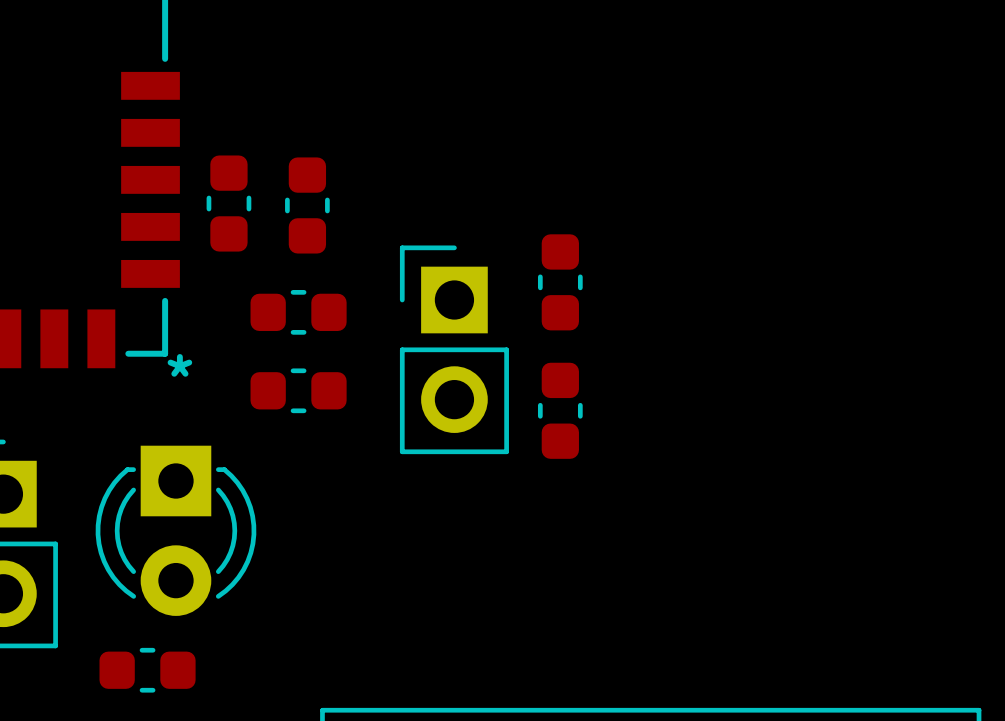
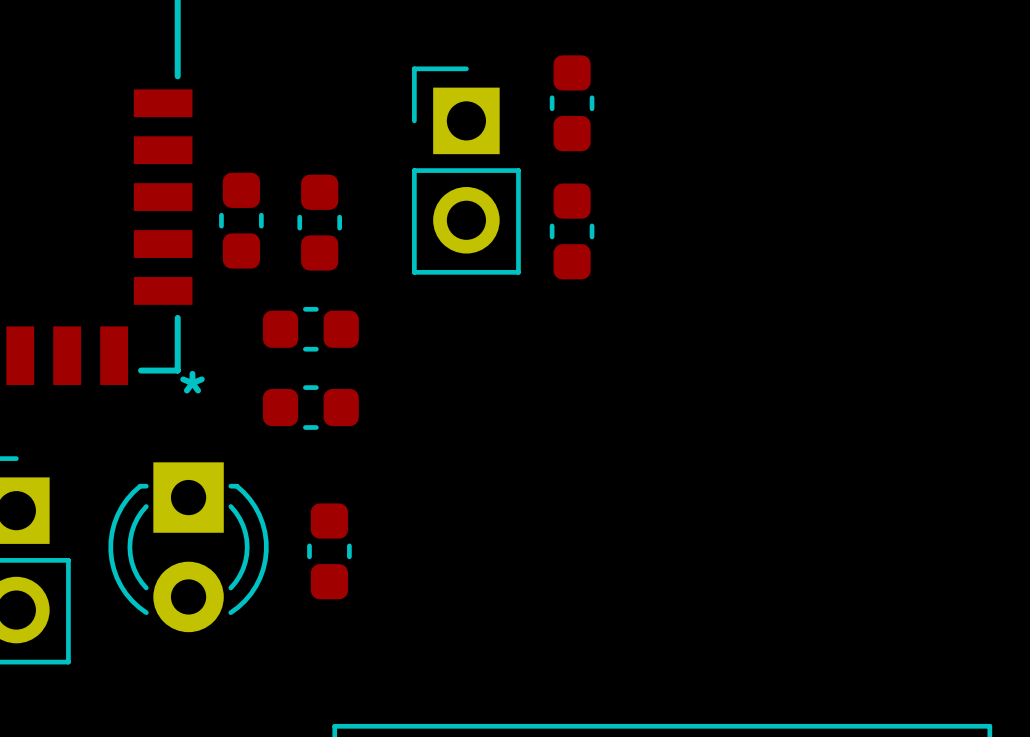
part: none -> (572, 103)
part position: (560, 282) -> (572, 231)
part position: (454, 349) -> (466, 170)
part: (560, 410) -> none
part: none -> (329, 551)
part: (147, 670) -> none

